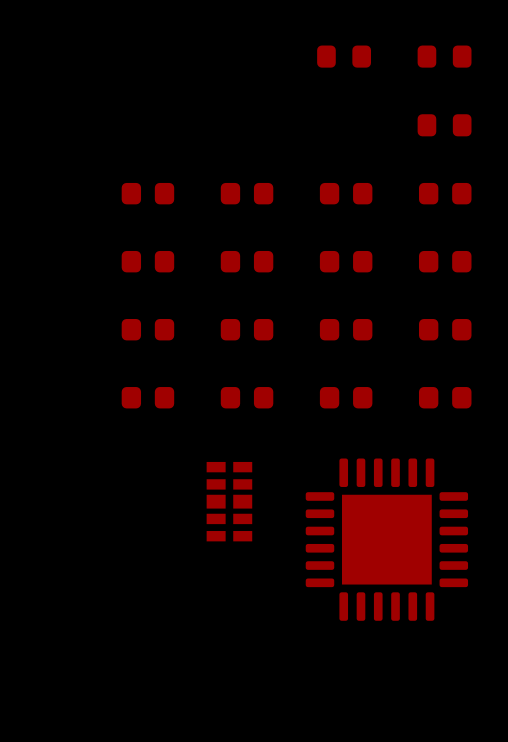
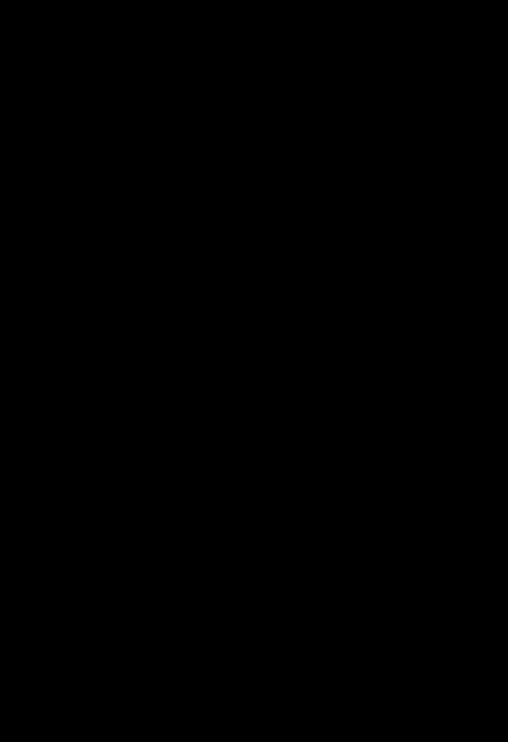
part: (344, 56) -> none
part: (444, 56) -> none
part: (444, 125) -> none
part: (147, 193) -> none
part: (247, 193) -> none
part: (346, 193) -> none
part: (445, 193) -> none
part: (147, 261) -> none
part: (247, 261) -> none
part: (346, 261) -> none
part: (445, 261) -> none
part: (147, 329) -> none
part: (247, 329) -> none
part: (346, 329) -> none
part: (445, 329) -> none
part: (147, 397) -> none
part: (247, 397) -> none
part: (346, 397) -> none
part: (445, 397) -> none
part: (229, 501) -> none
part: (386, 539) -> none

